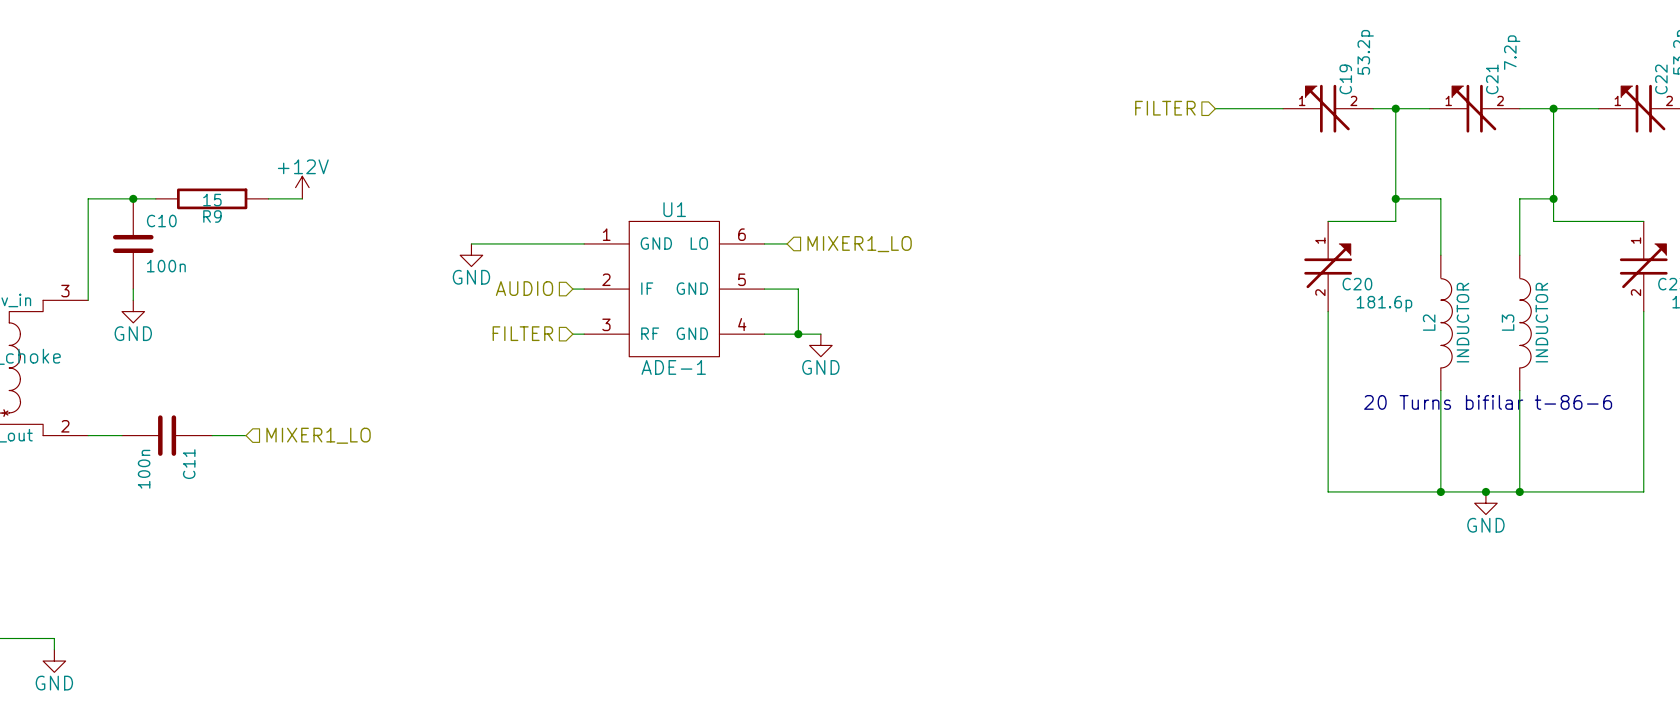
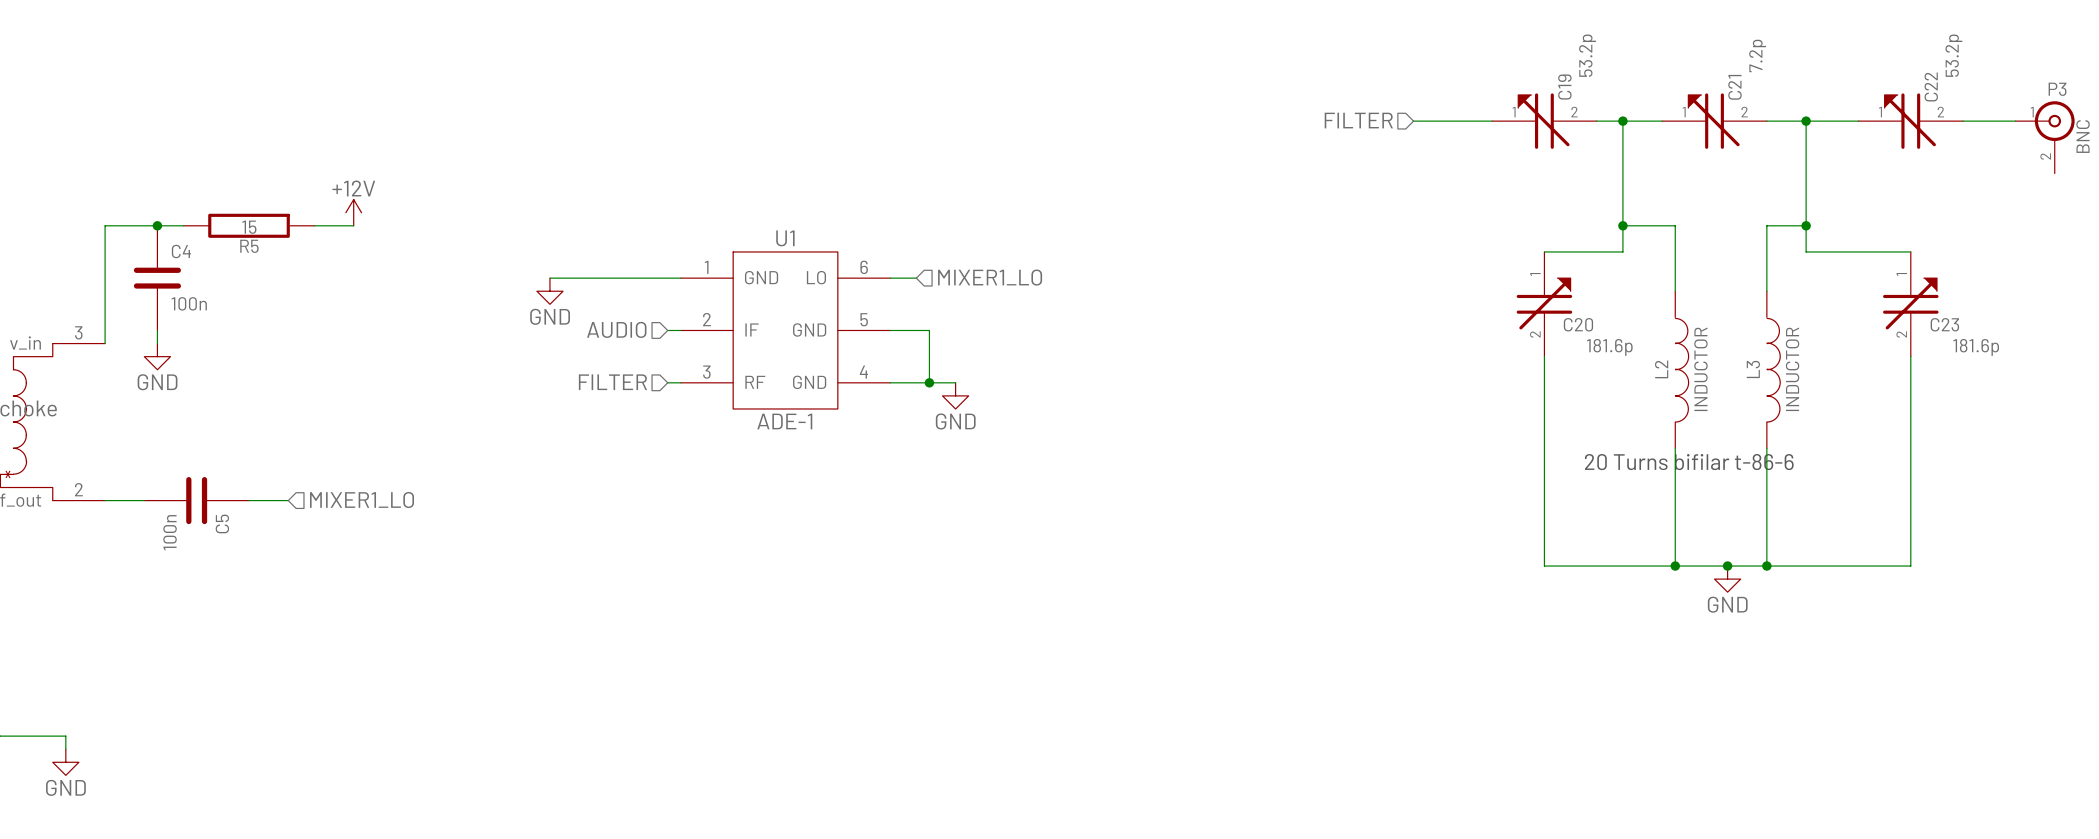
R9 name: R9 (212, 216) -> R5 (249, 246)
C10 name: C10 (161, 221) -> C4 (181, 251)
C11 name: C11 (189, 464) -> C5 (222, 523)

